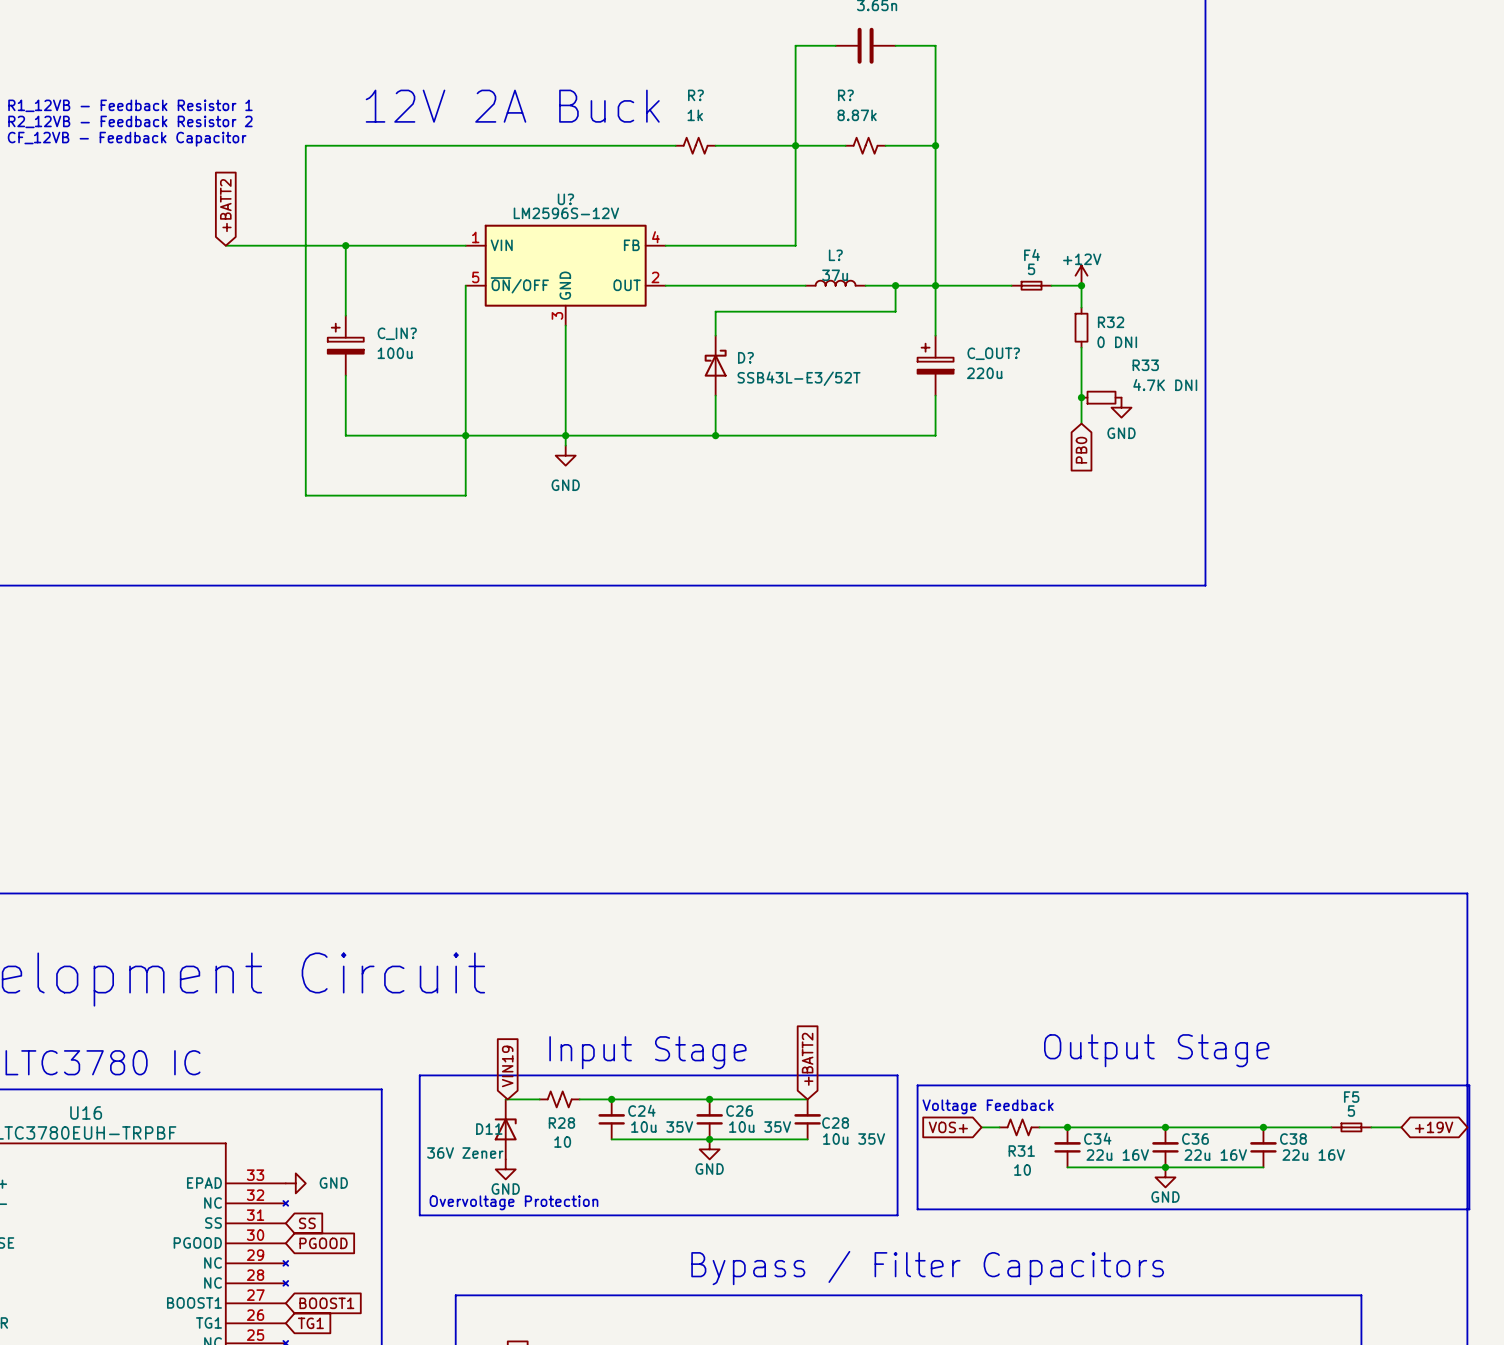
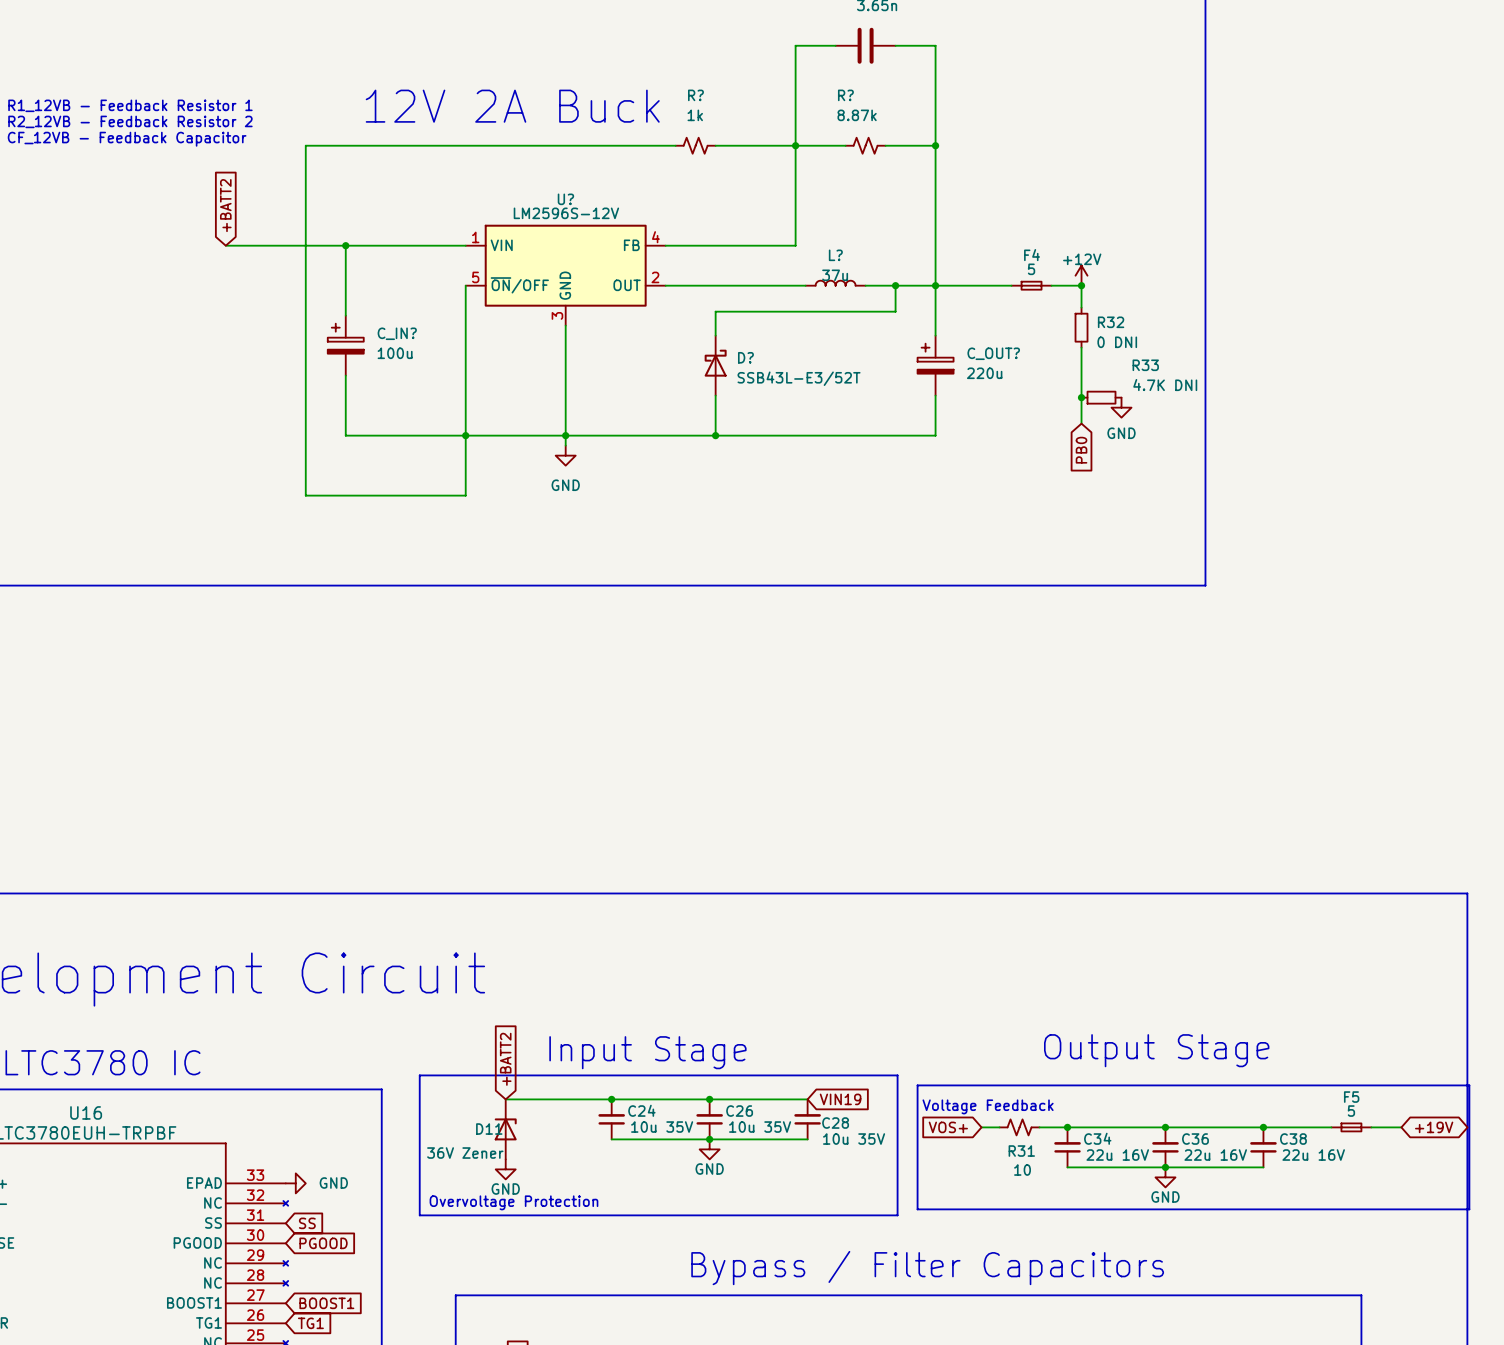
global label: +BATT2 (807, 1059) -> VIN19 (840, 1099)
global label: VIN19 (507, 1066) -> +BATT2 (505, 1059)
R28: 10 (559, 1099) -> none

